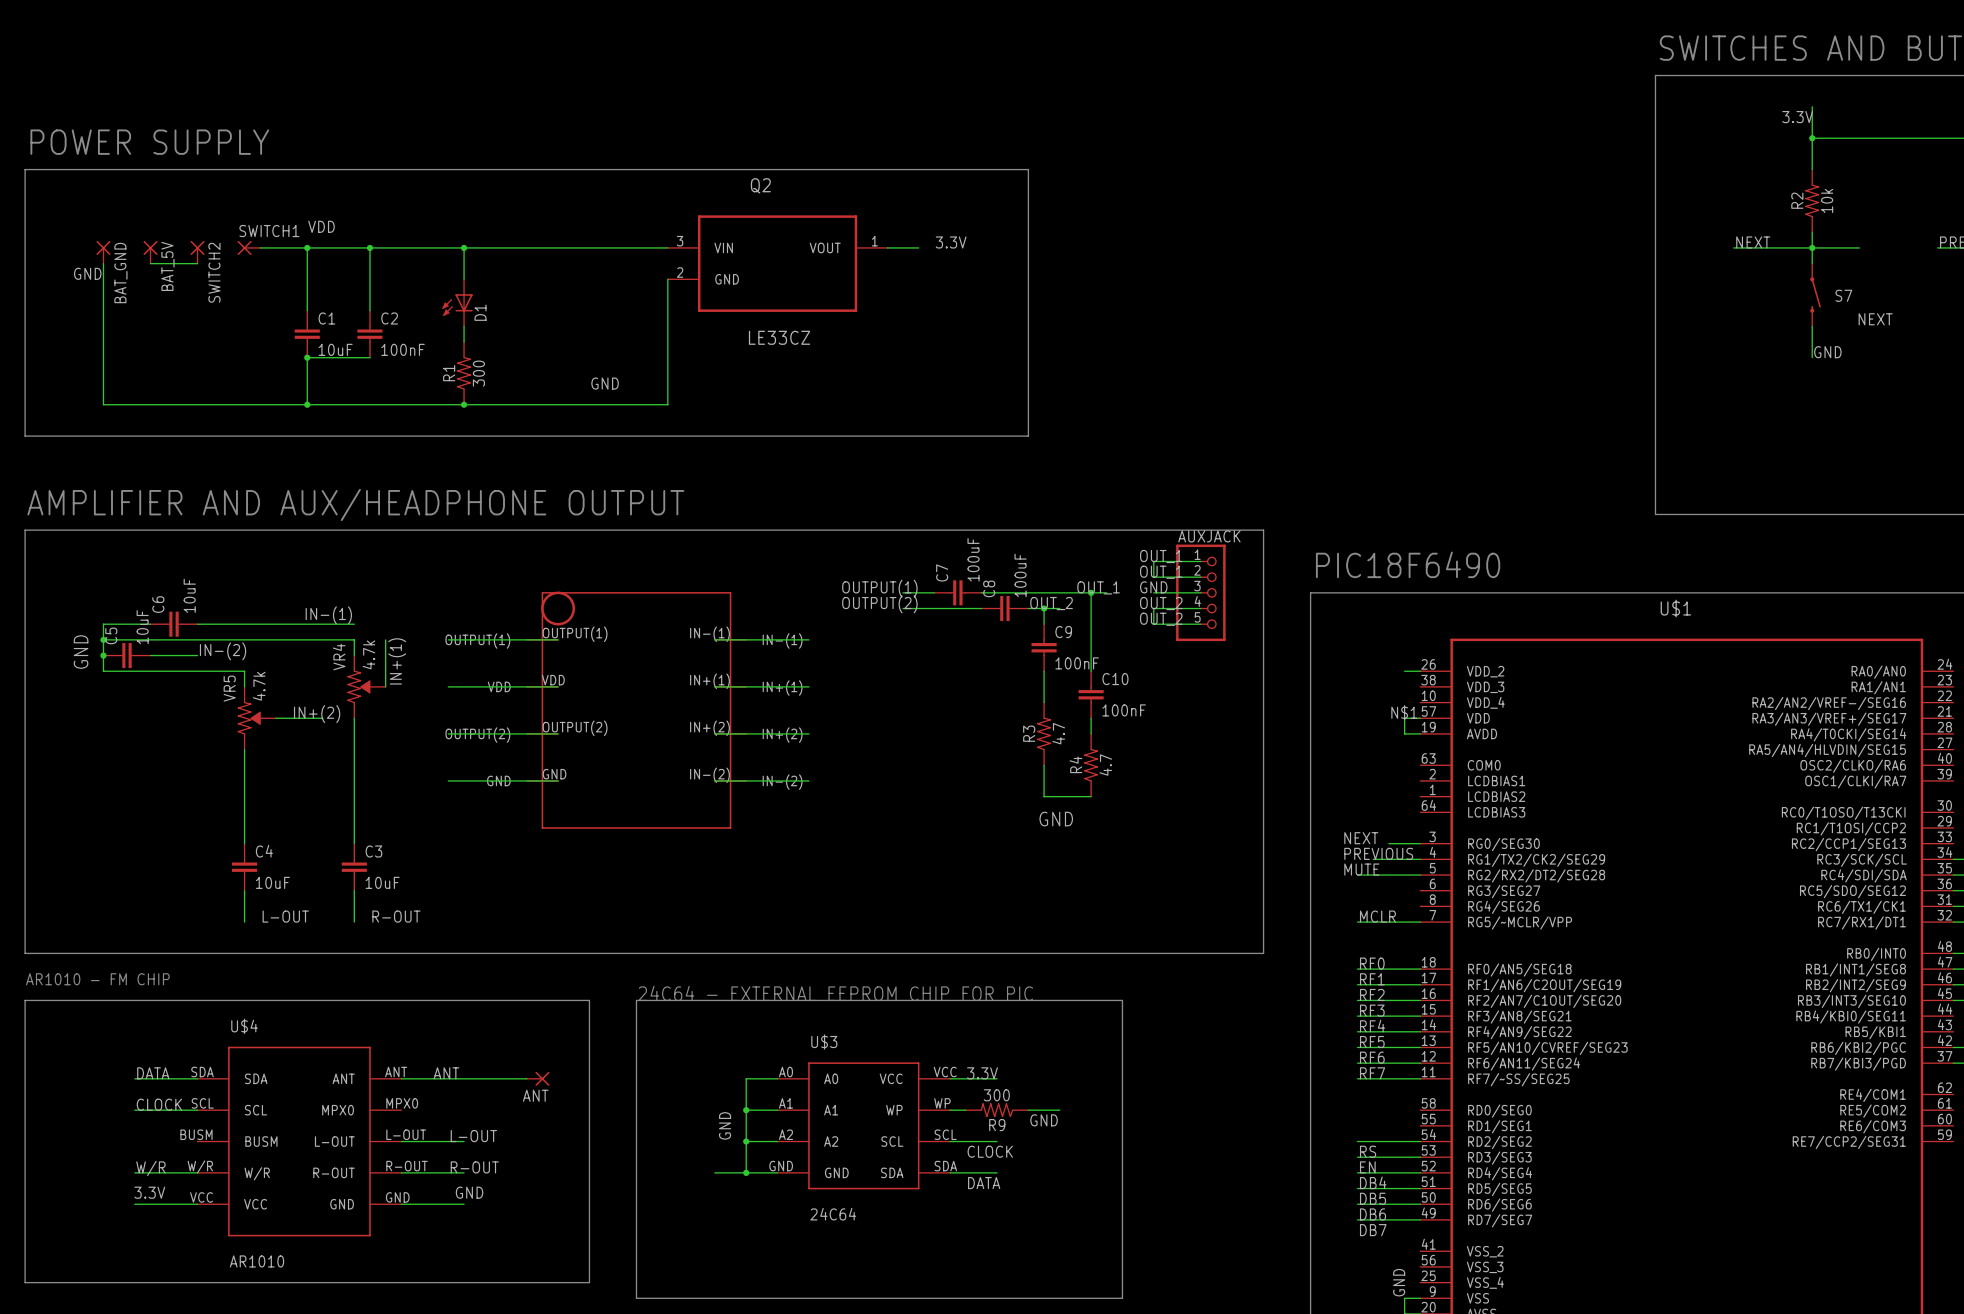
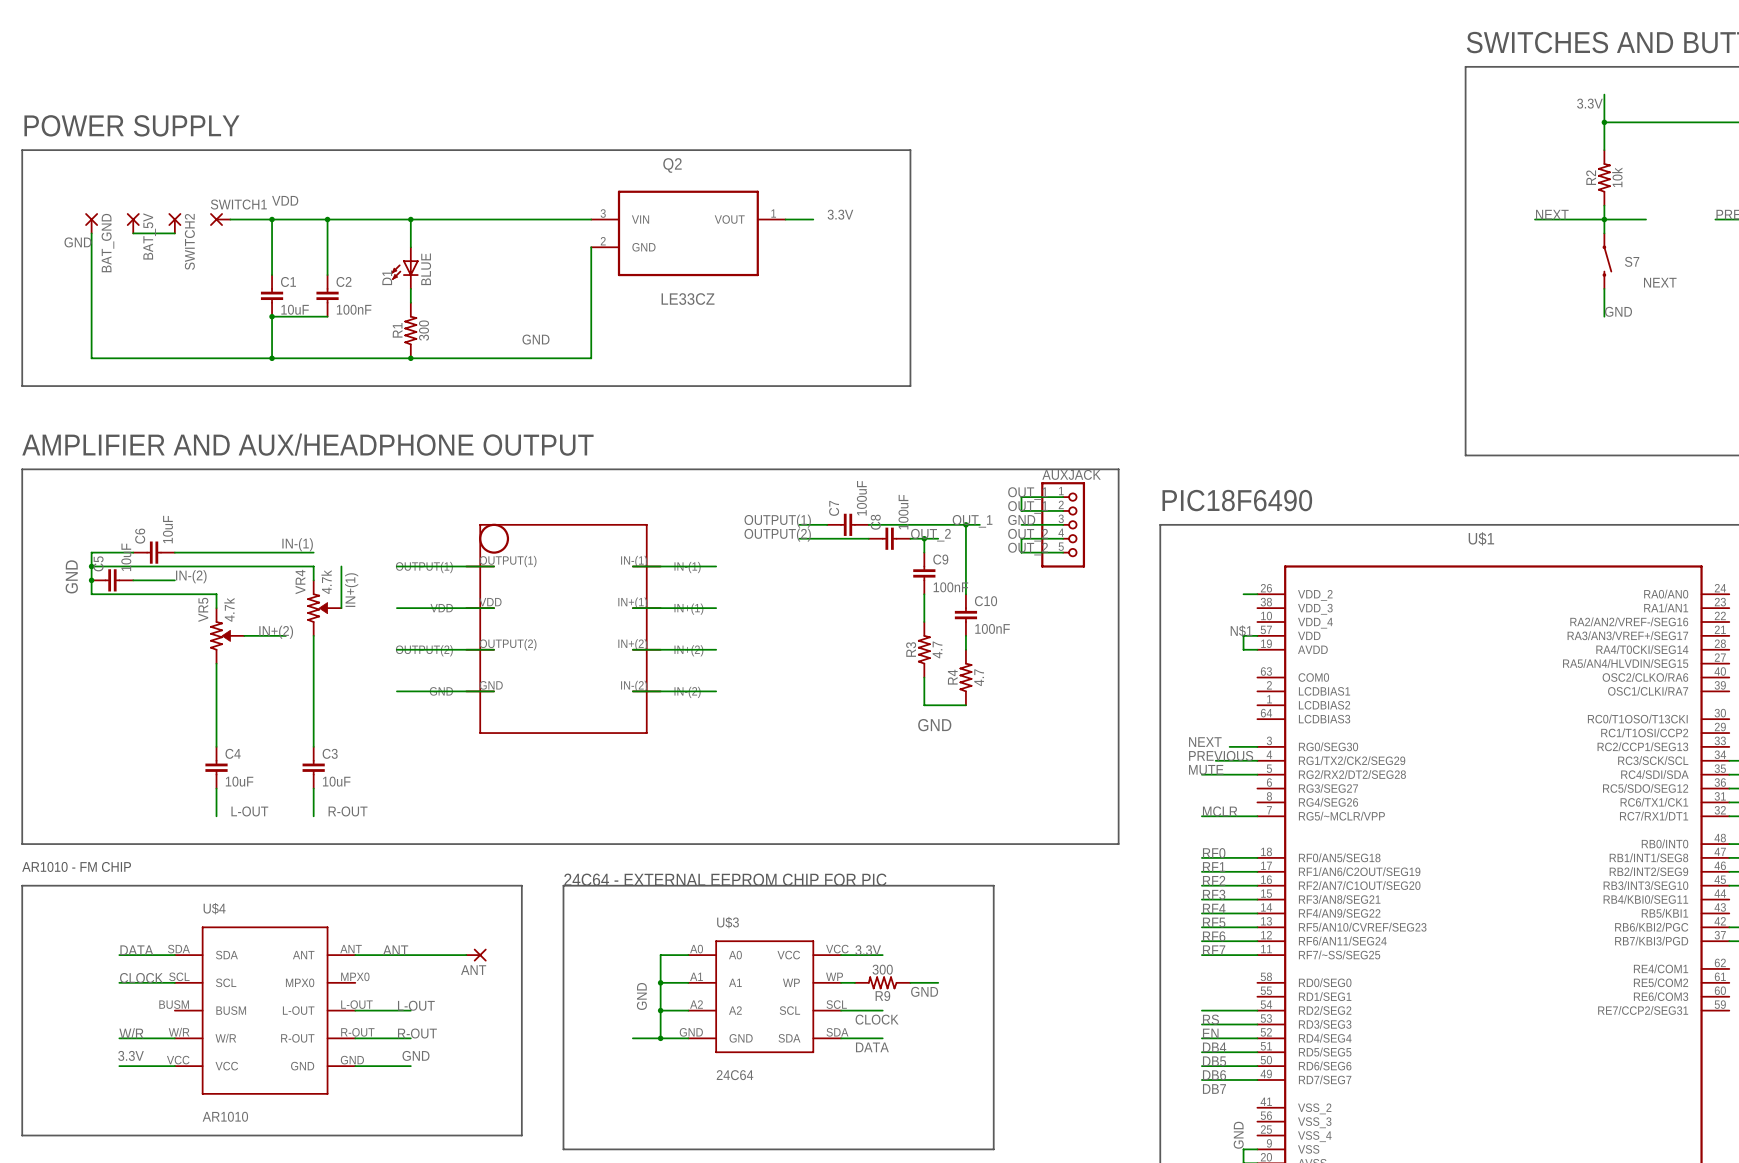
D1 value: none -> BLUE (426, 269)
D1 name position: D1 (480, 312) -> D1 (387, 277)

